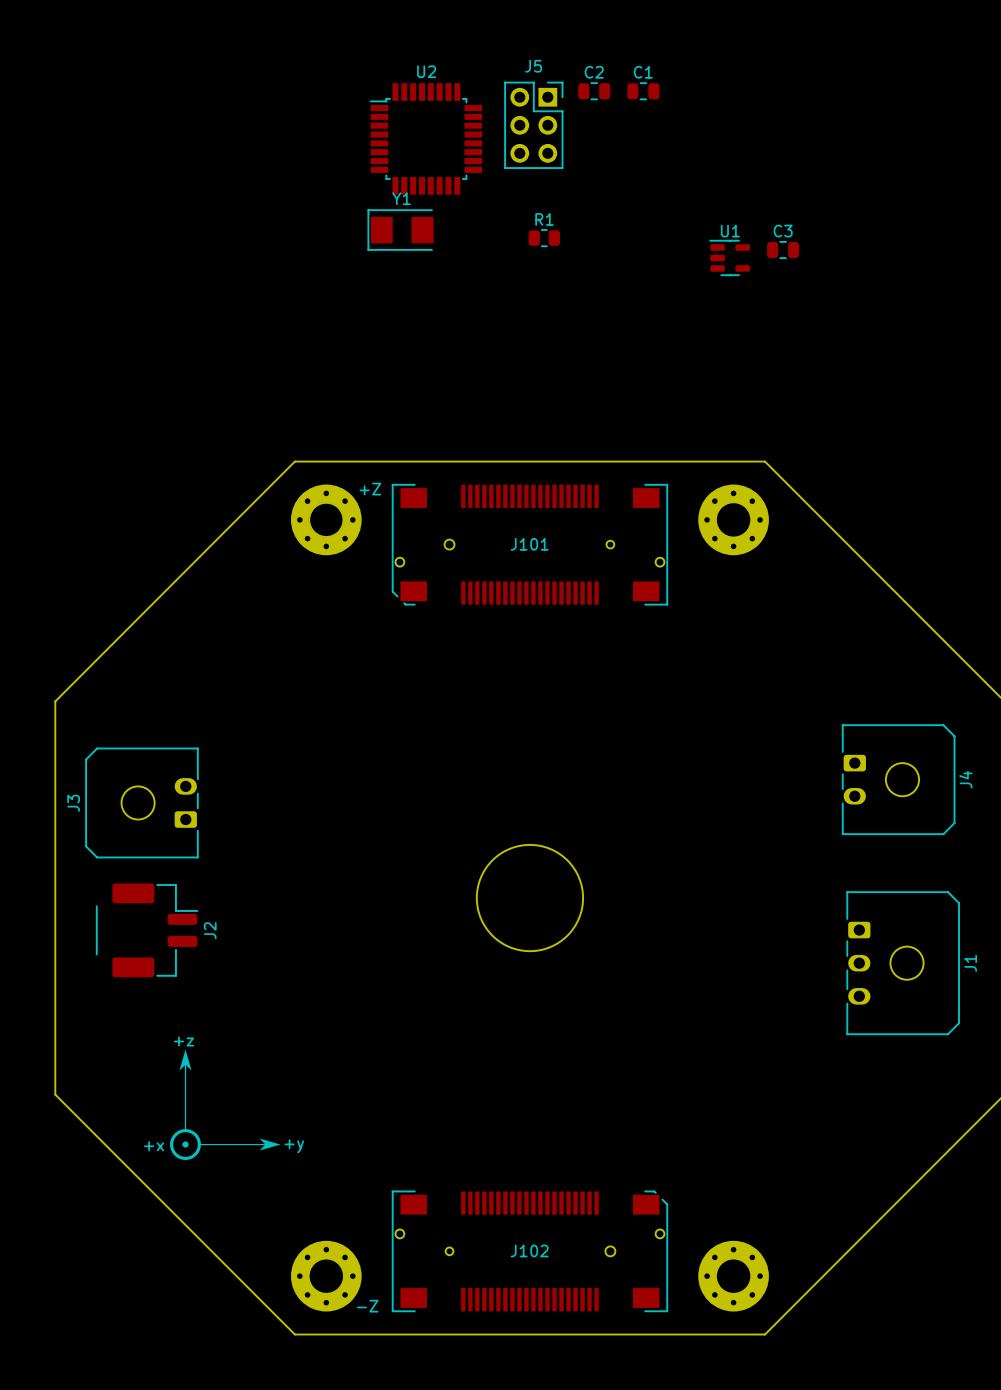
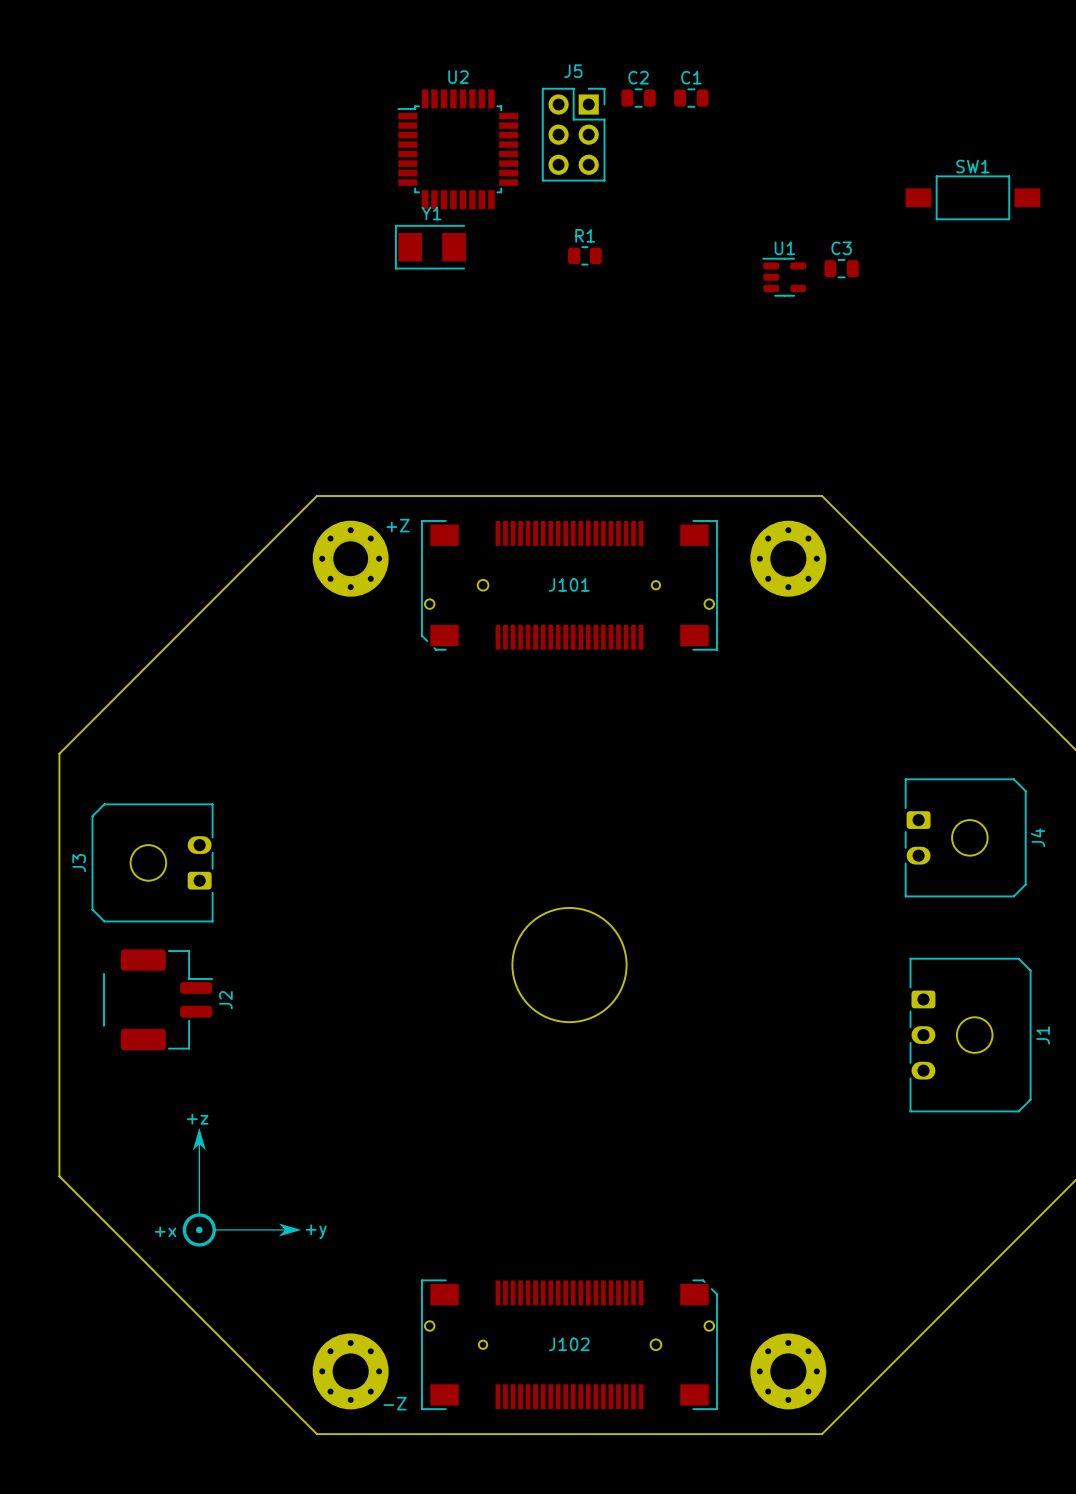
SW1: none -> (972, 197)

